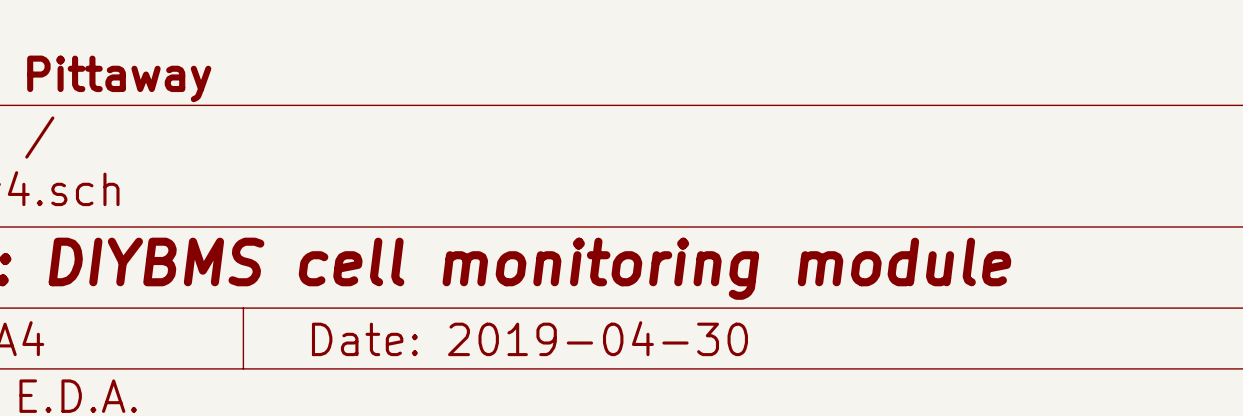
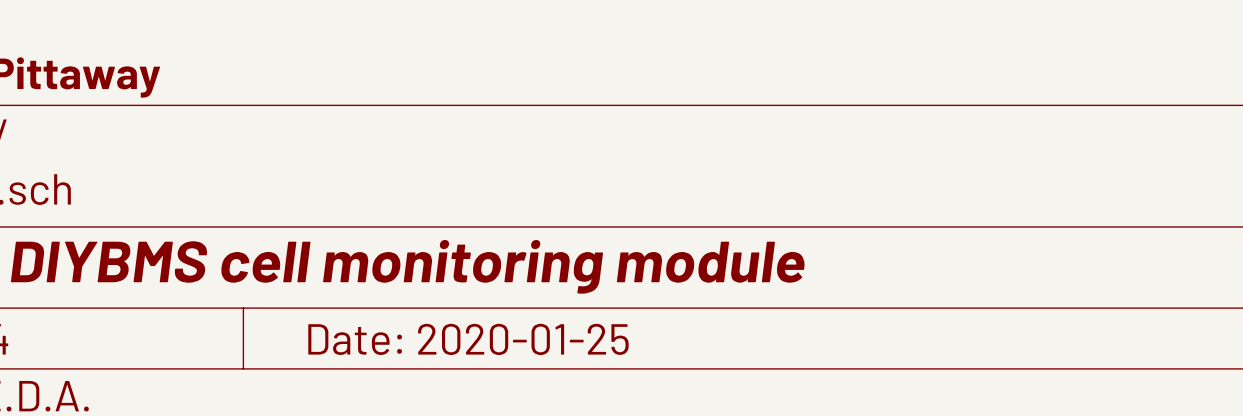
title block: Date: 2019-04-30 (529, 338) -> Date: 2020-01-25 (468, 339)

